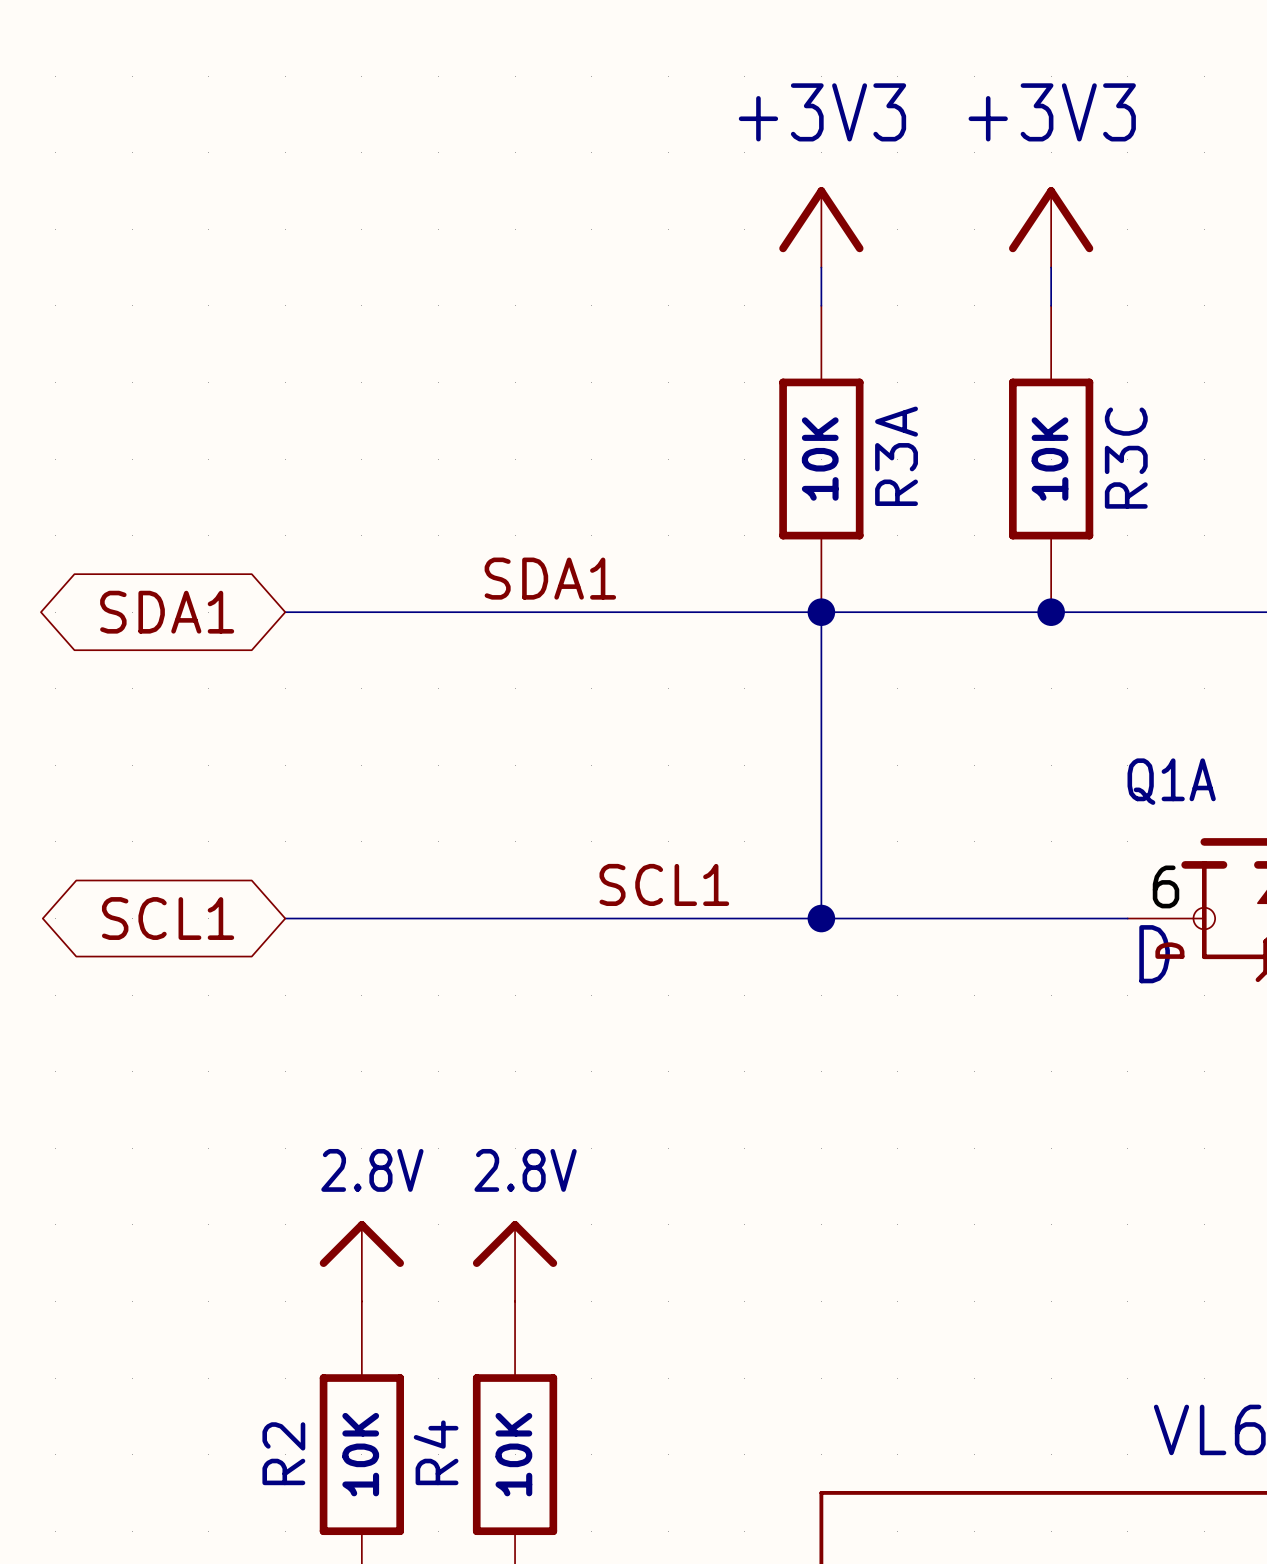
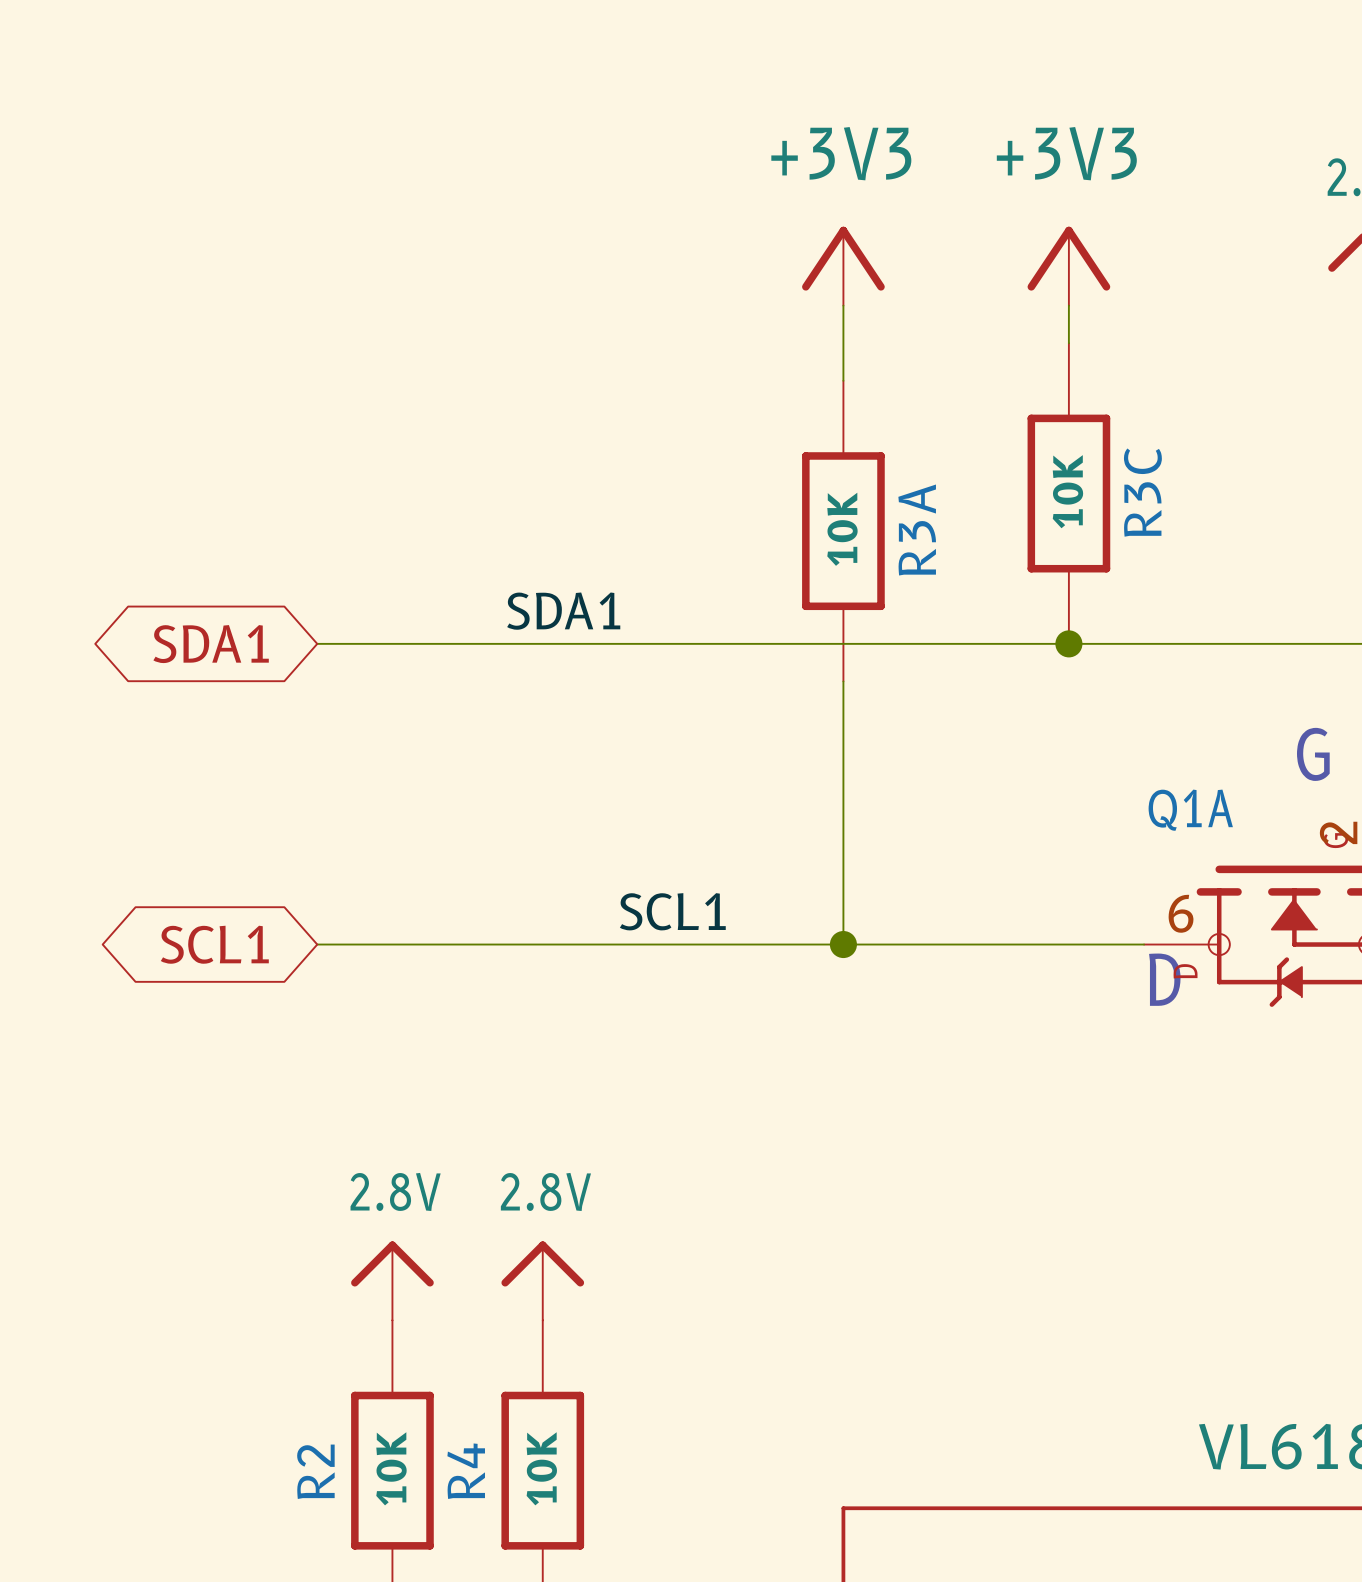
R3A position: (821, 459) -> (843, 531)
junction: (821, 612) -> none

